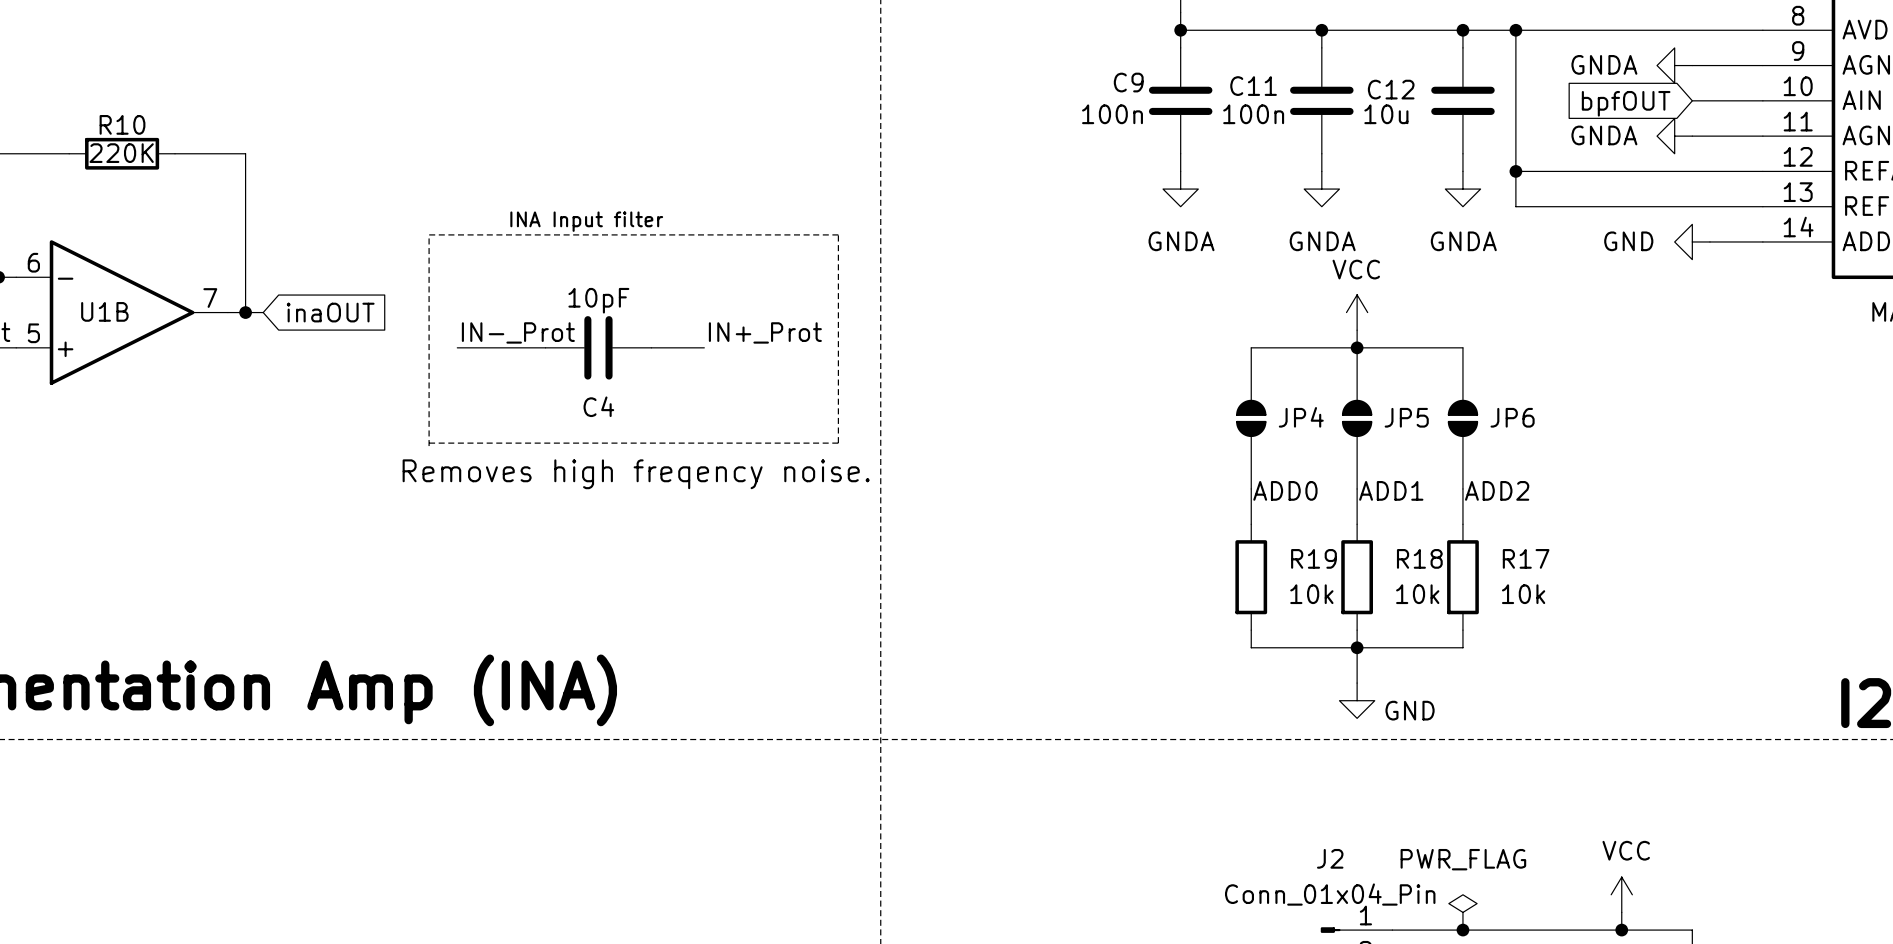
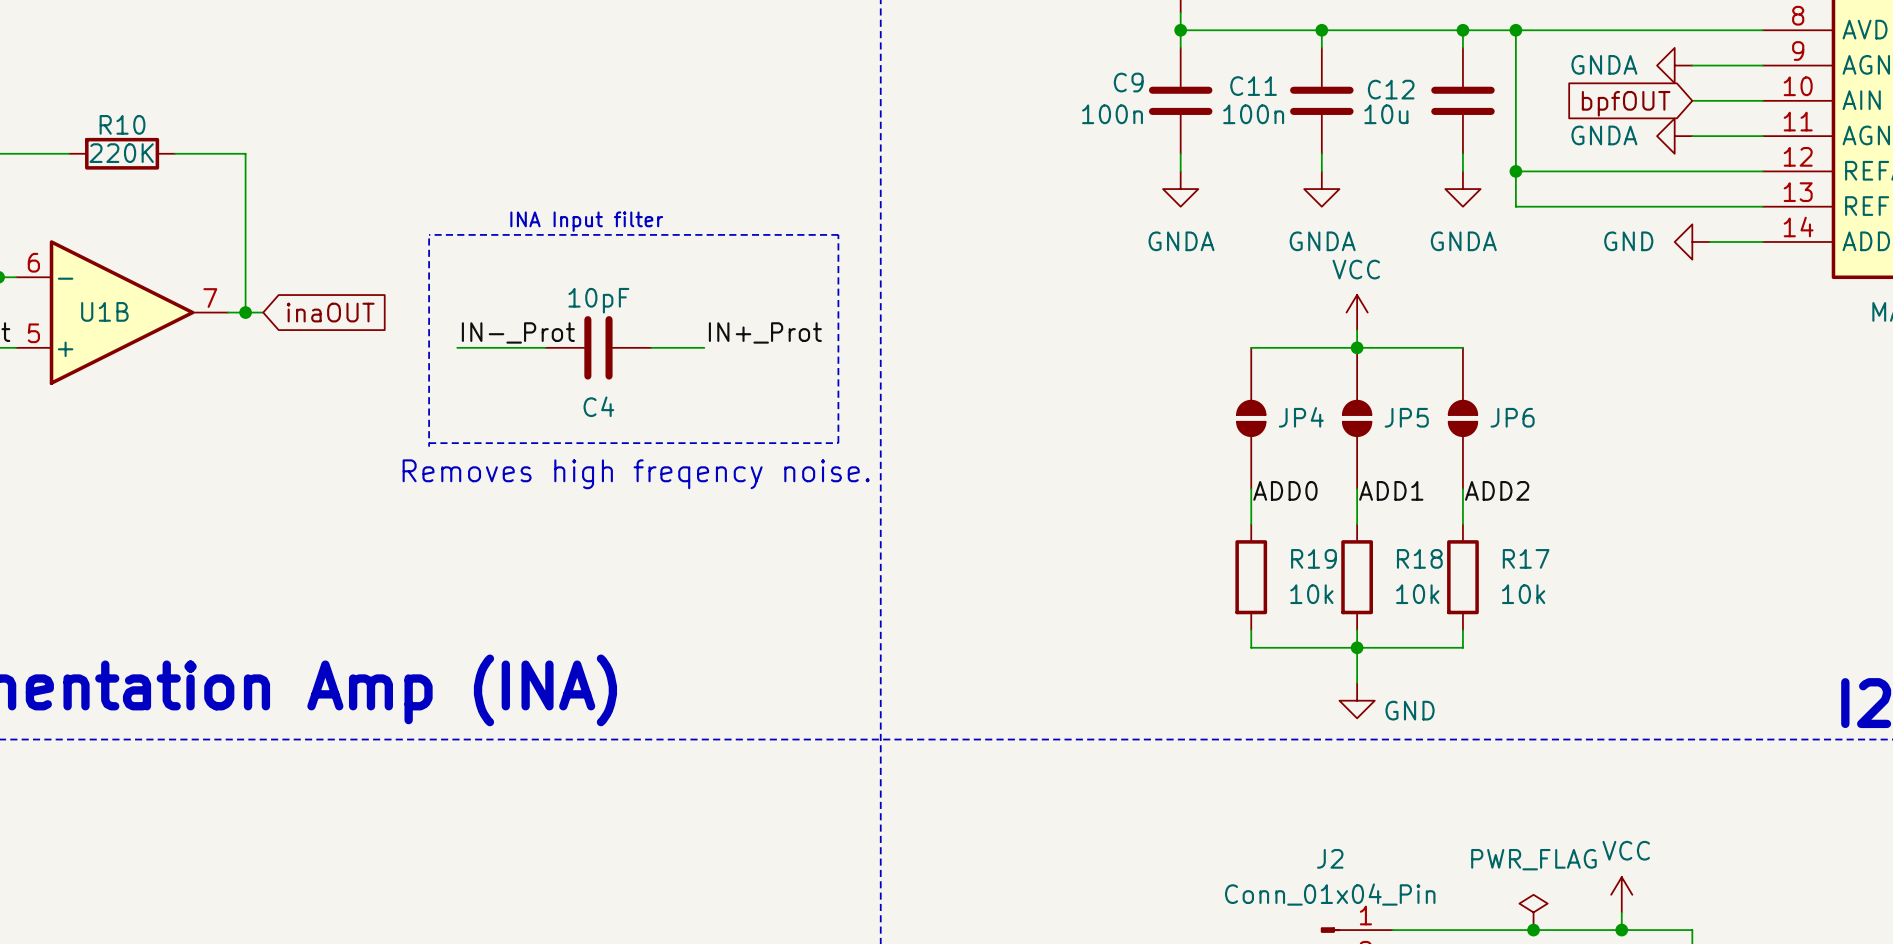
power symbol position: PWR_FLAG (1462, 912) -> PWR_FLAG (1533, 912)
junction: (1462, 930) -> none
junction: none -> (1533, 930)

